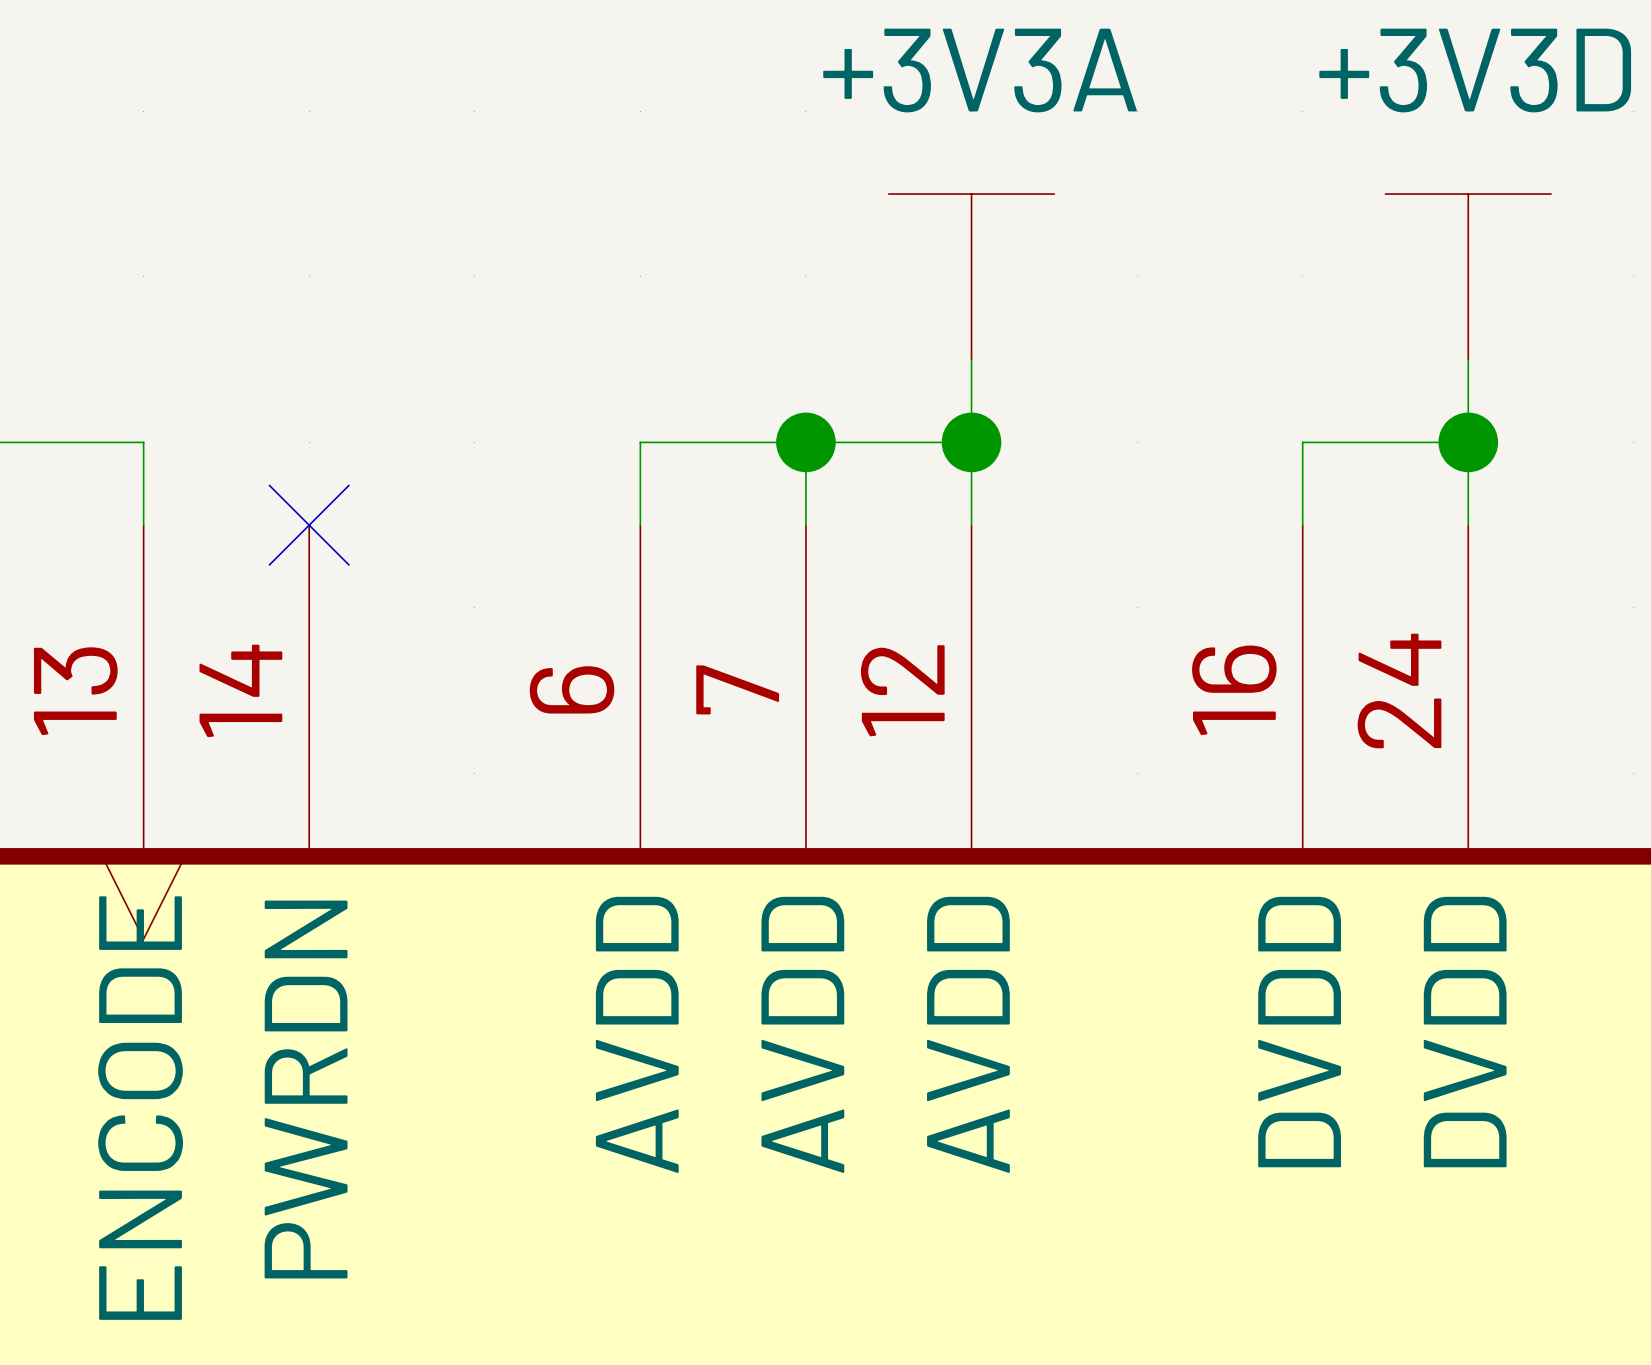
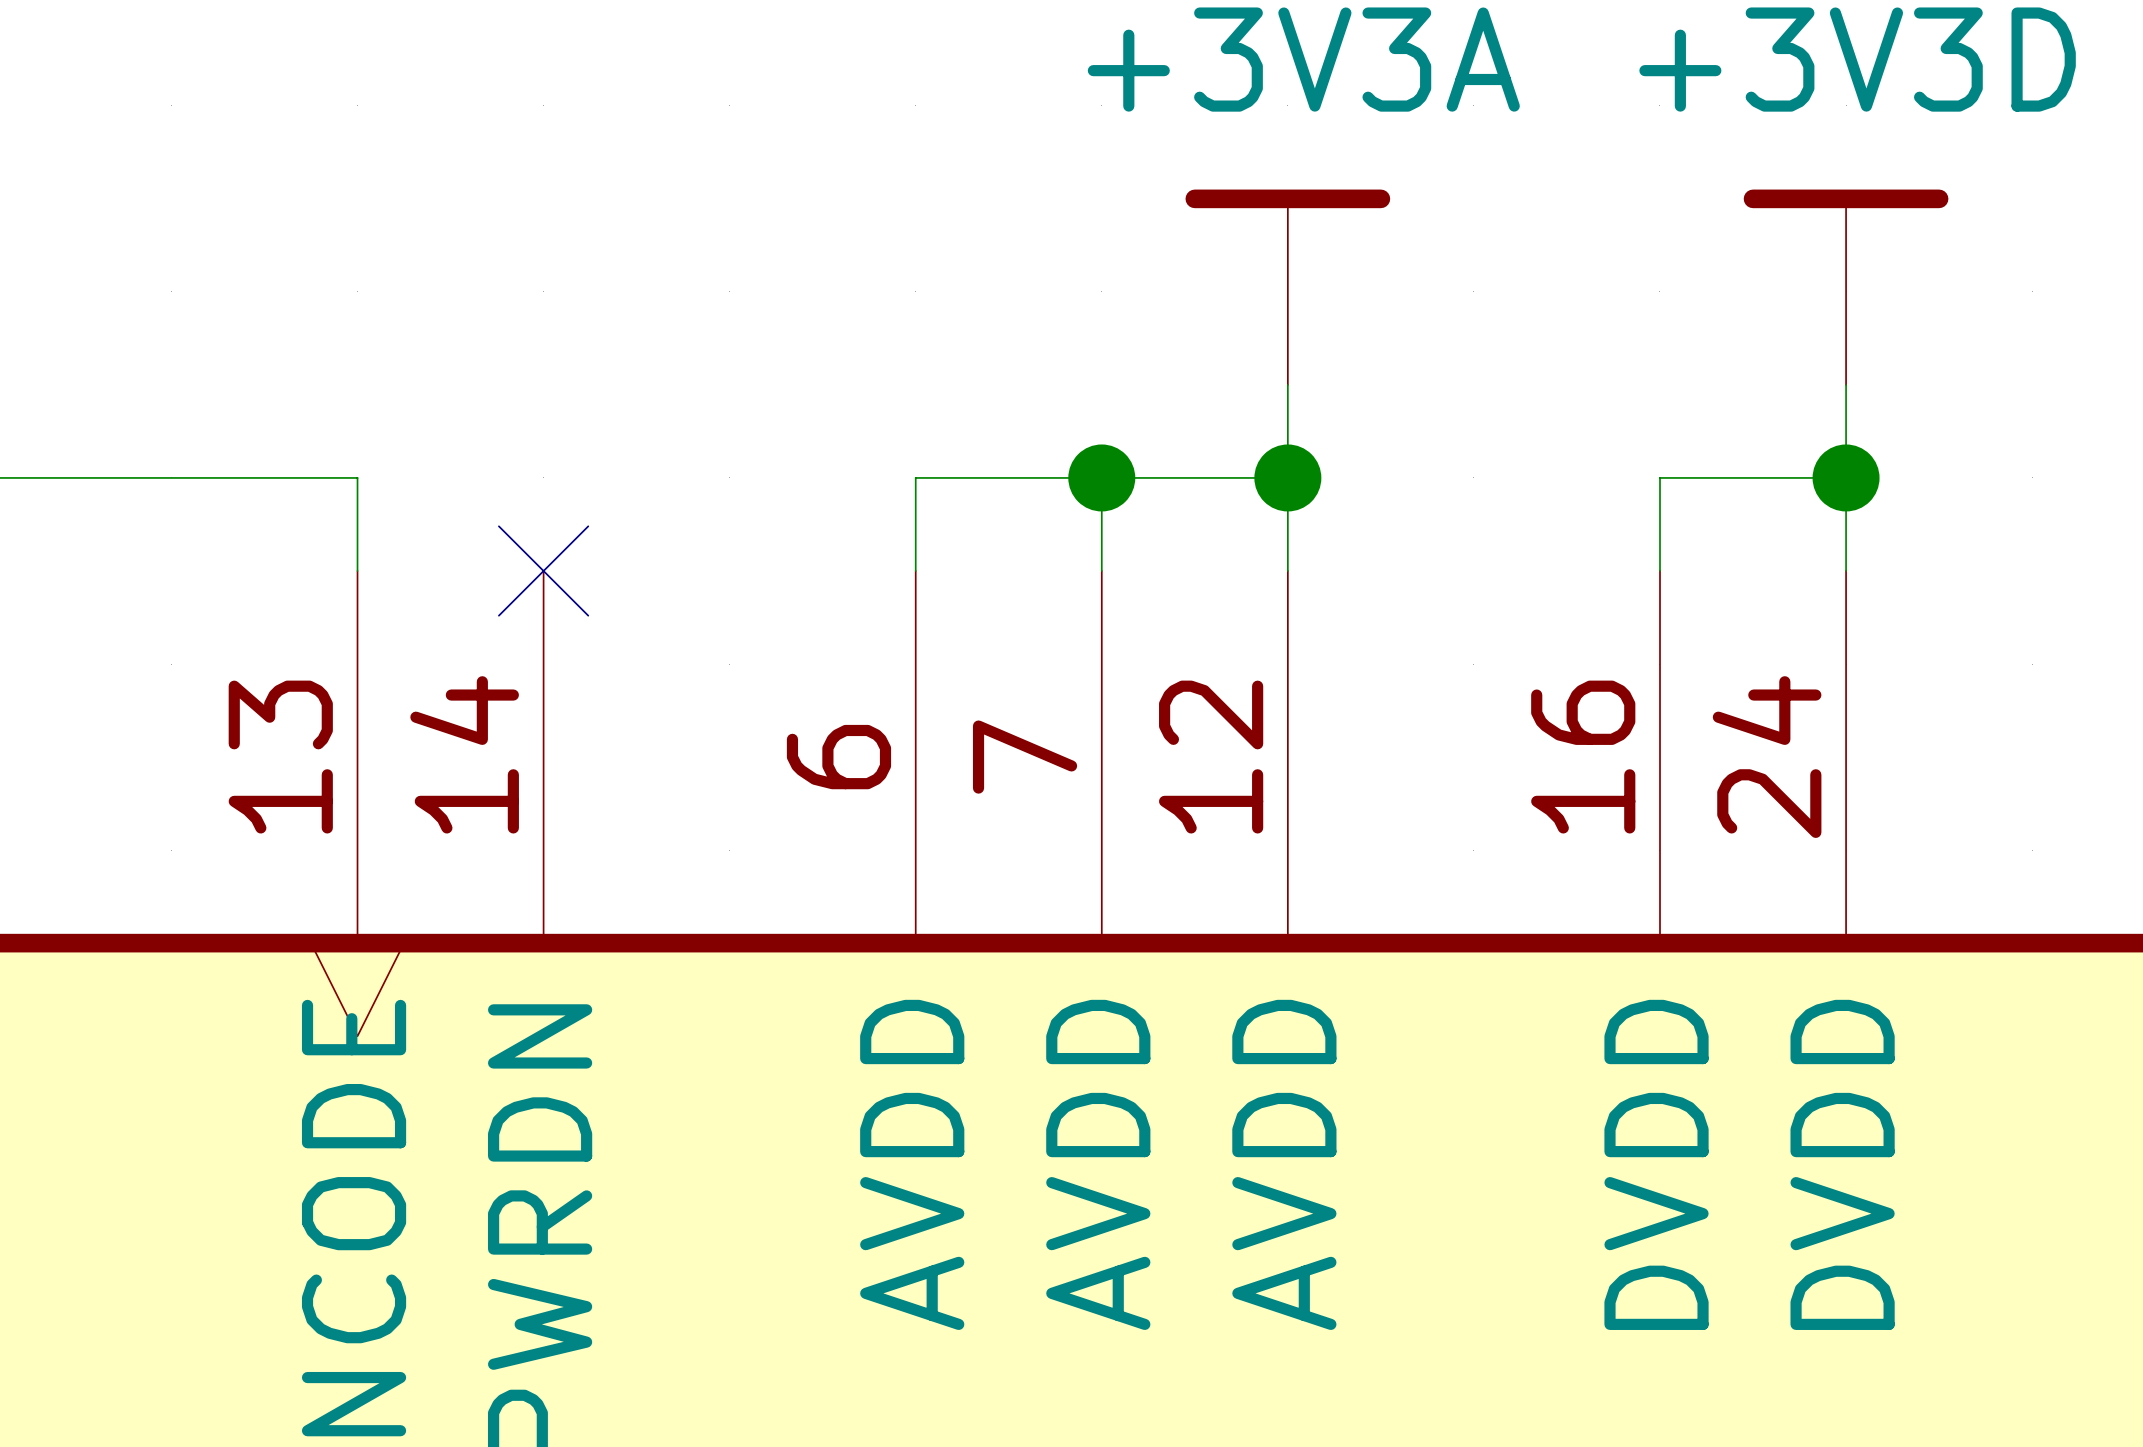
power symbol shape: [888, 194, 1055, 360] -> [1185, 189, 1391, 385]
power symbol shape: [1385, 194, 1552, 360] -> [1743, 189, 1949, 385]

